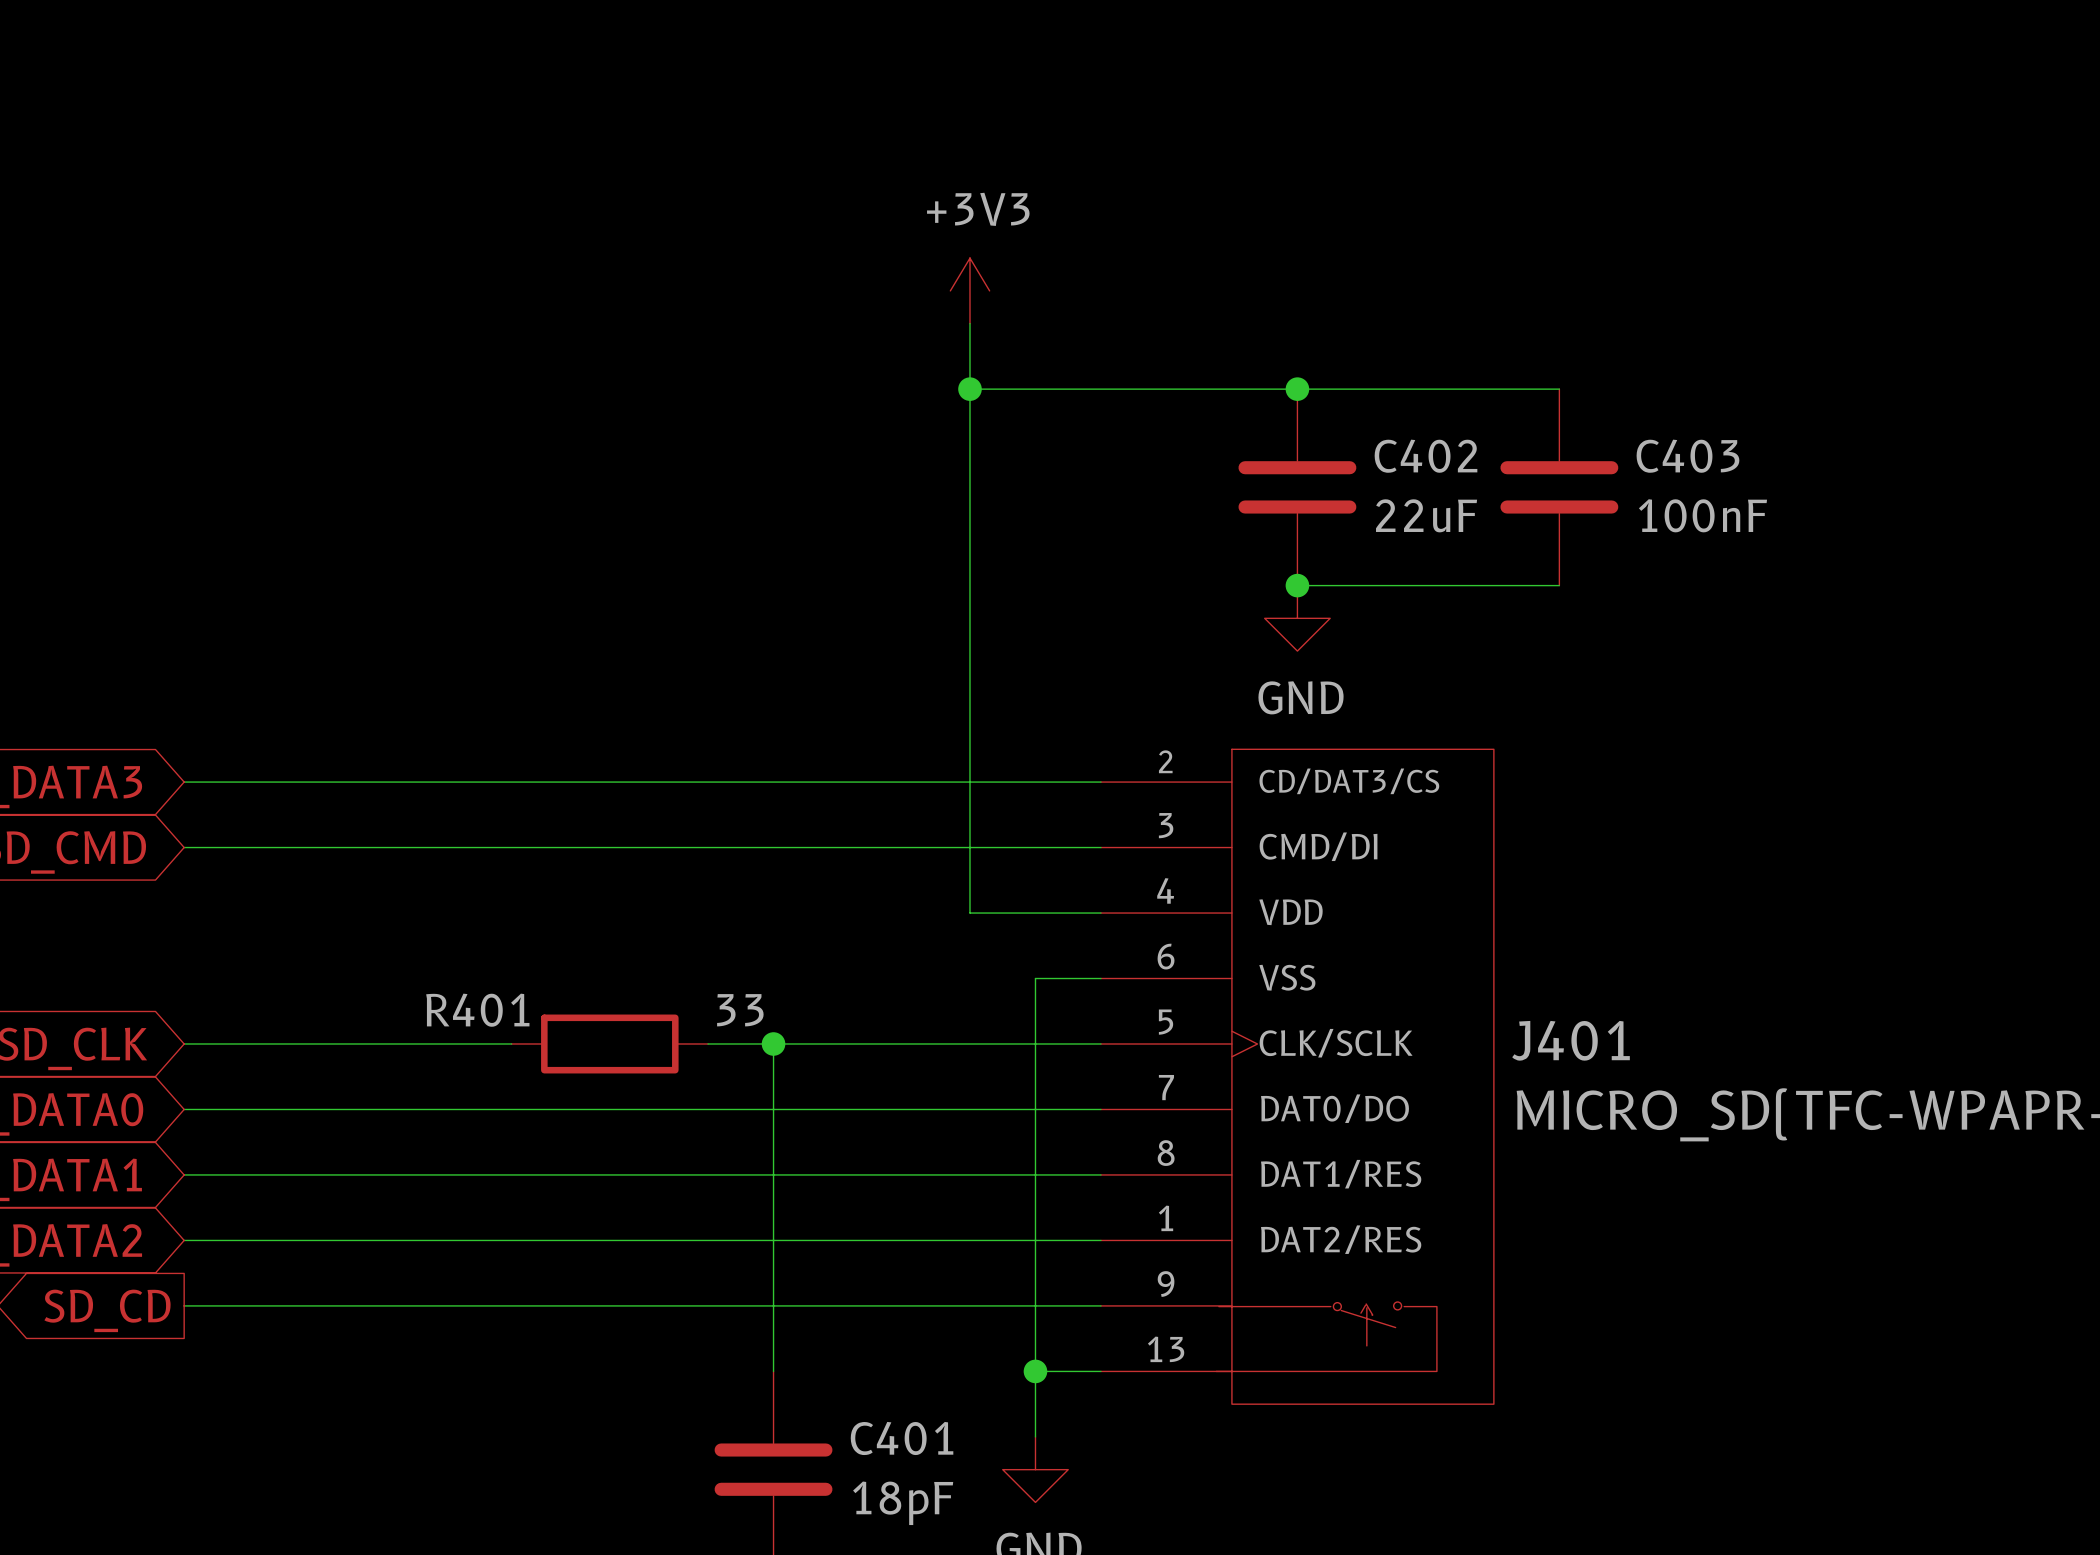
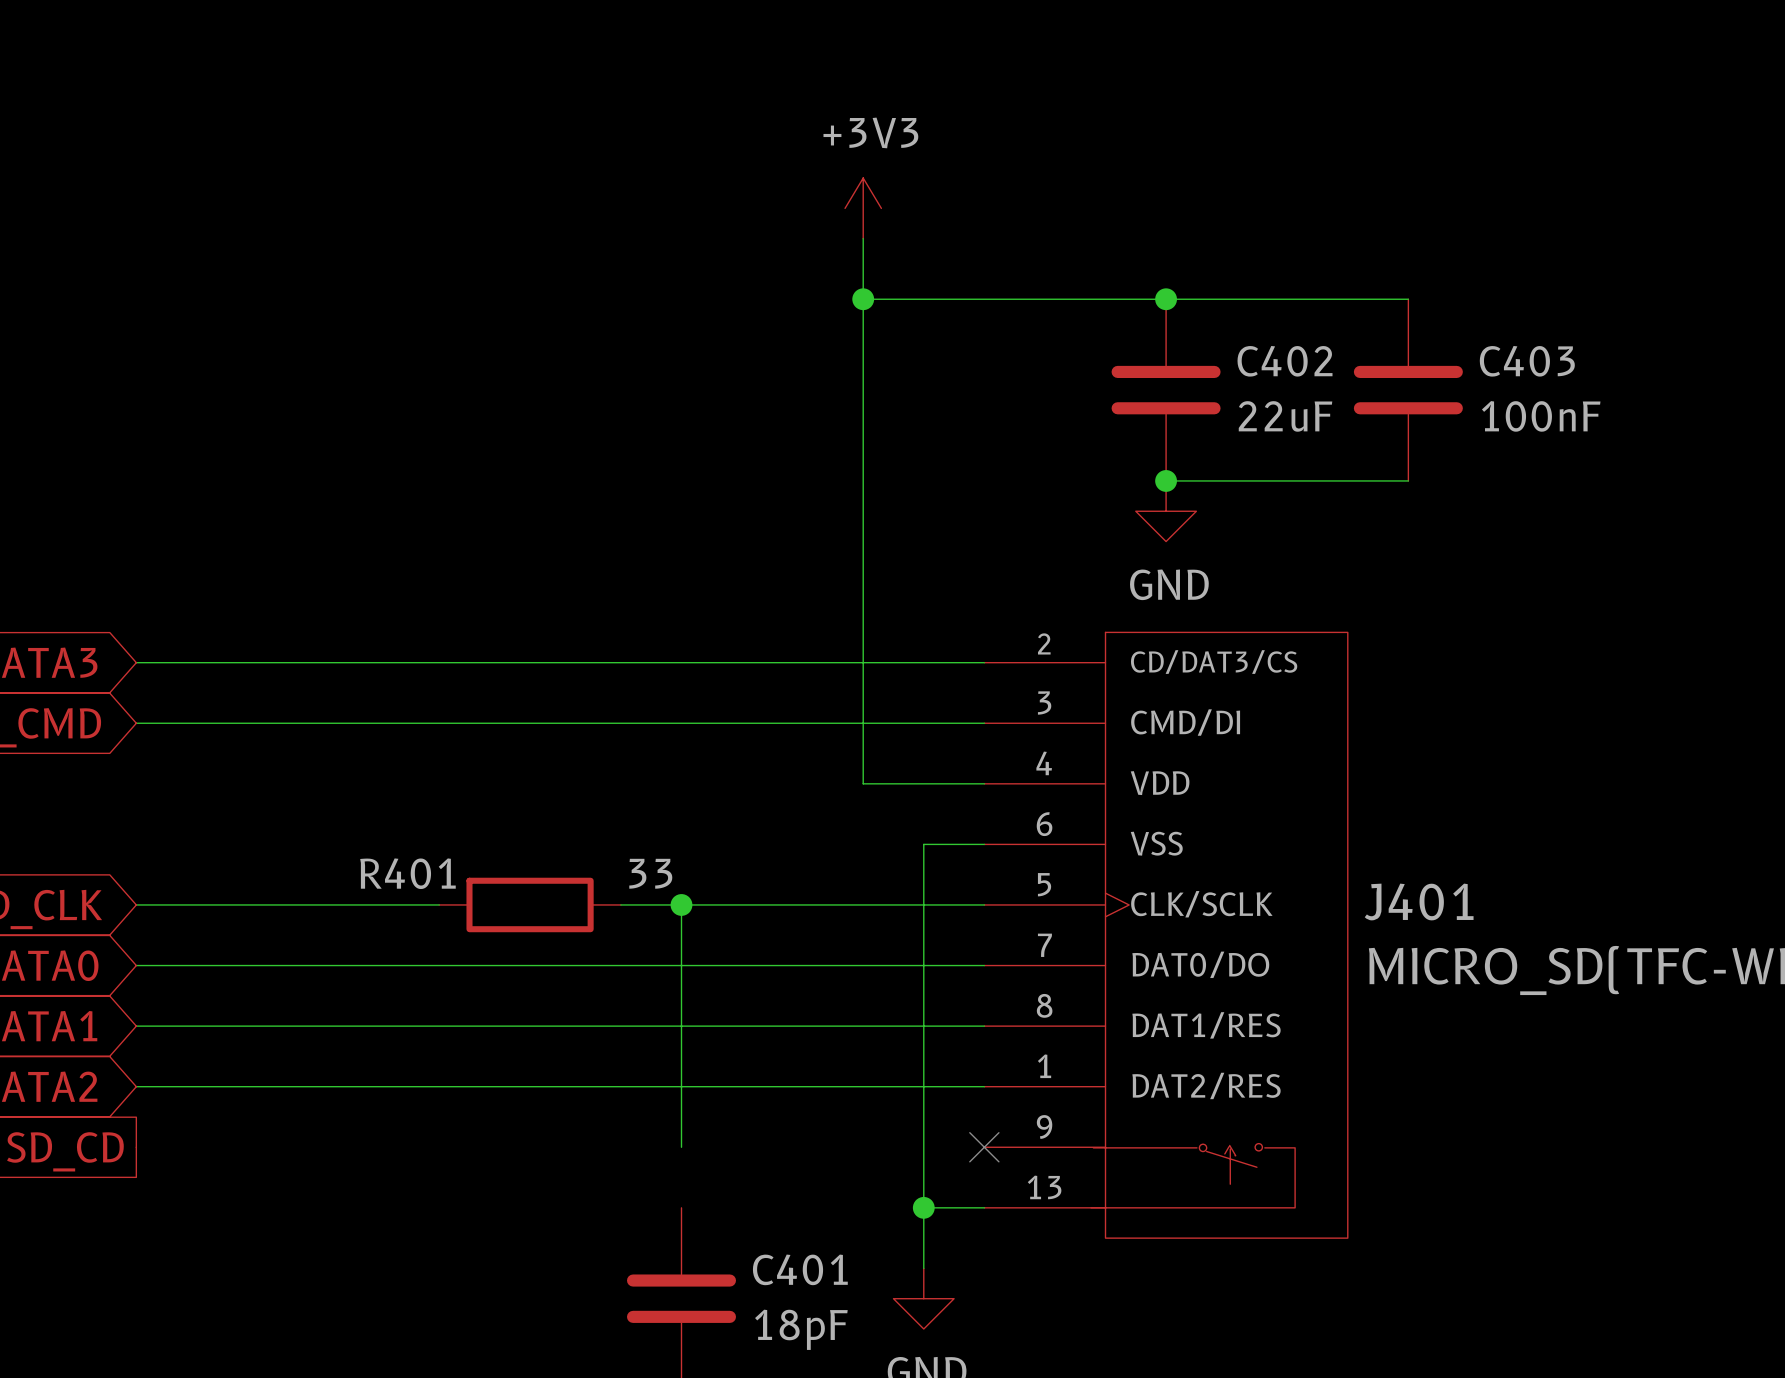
wire: (184, 1305) (1100, 1305) -> none
wire: (773, 1305) (773, 1371) -> none
no-connect mark: none -> (984, 1147)

